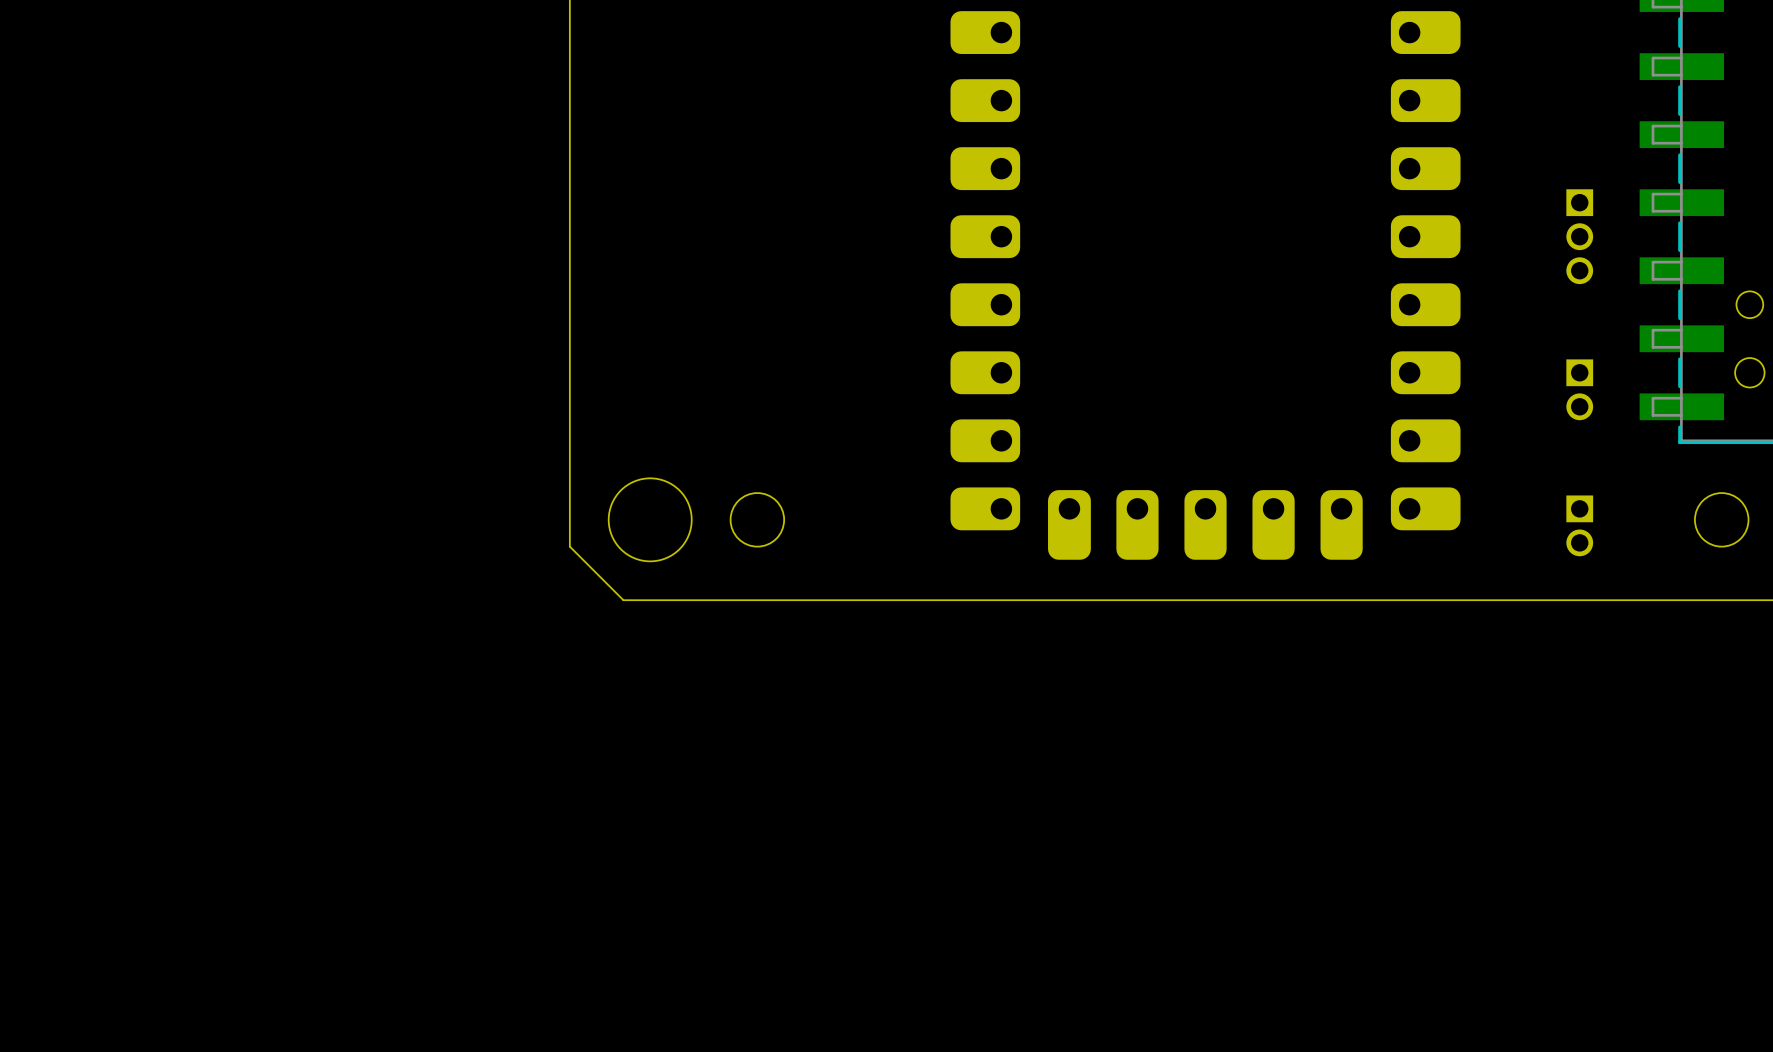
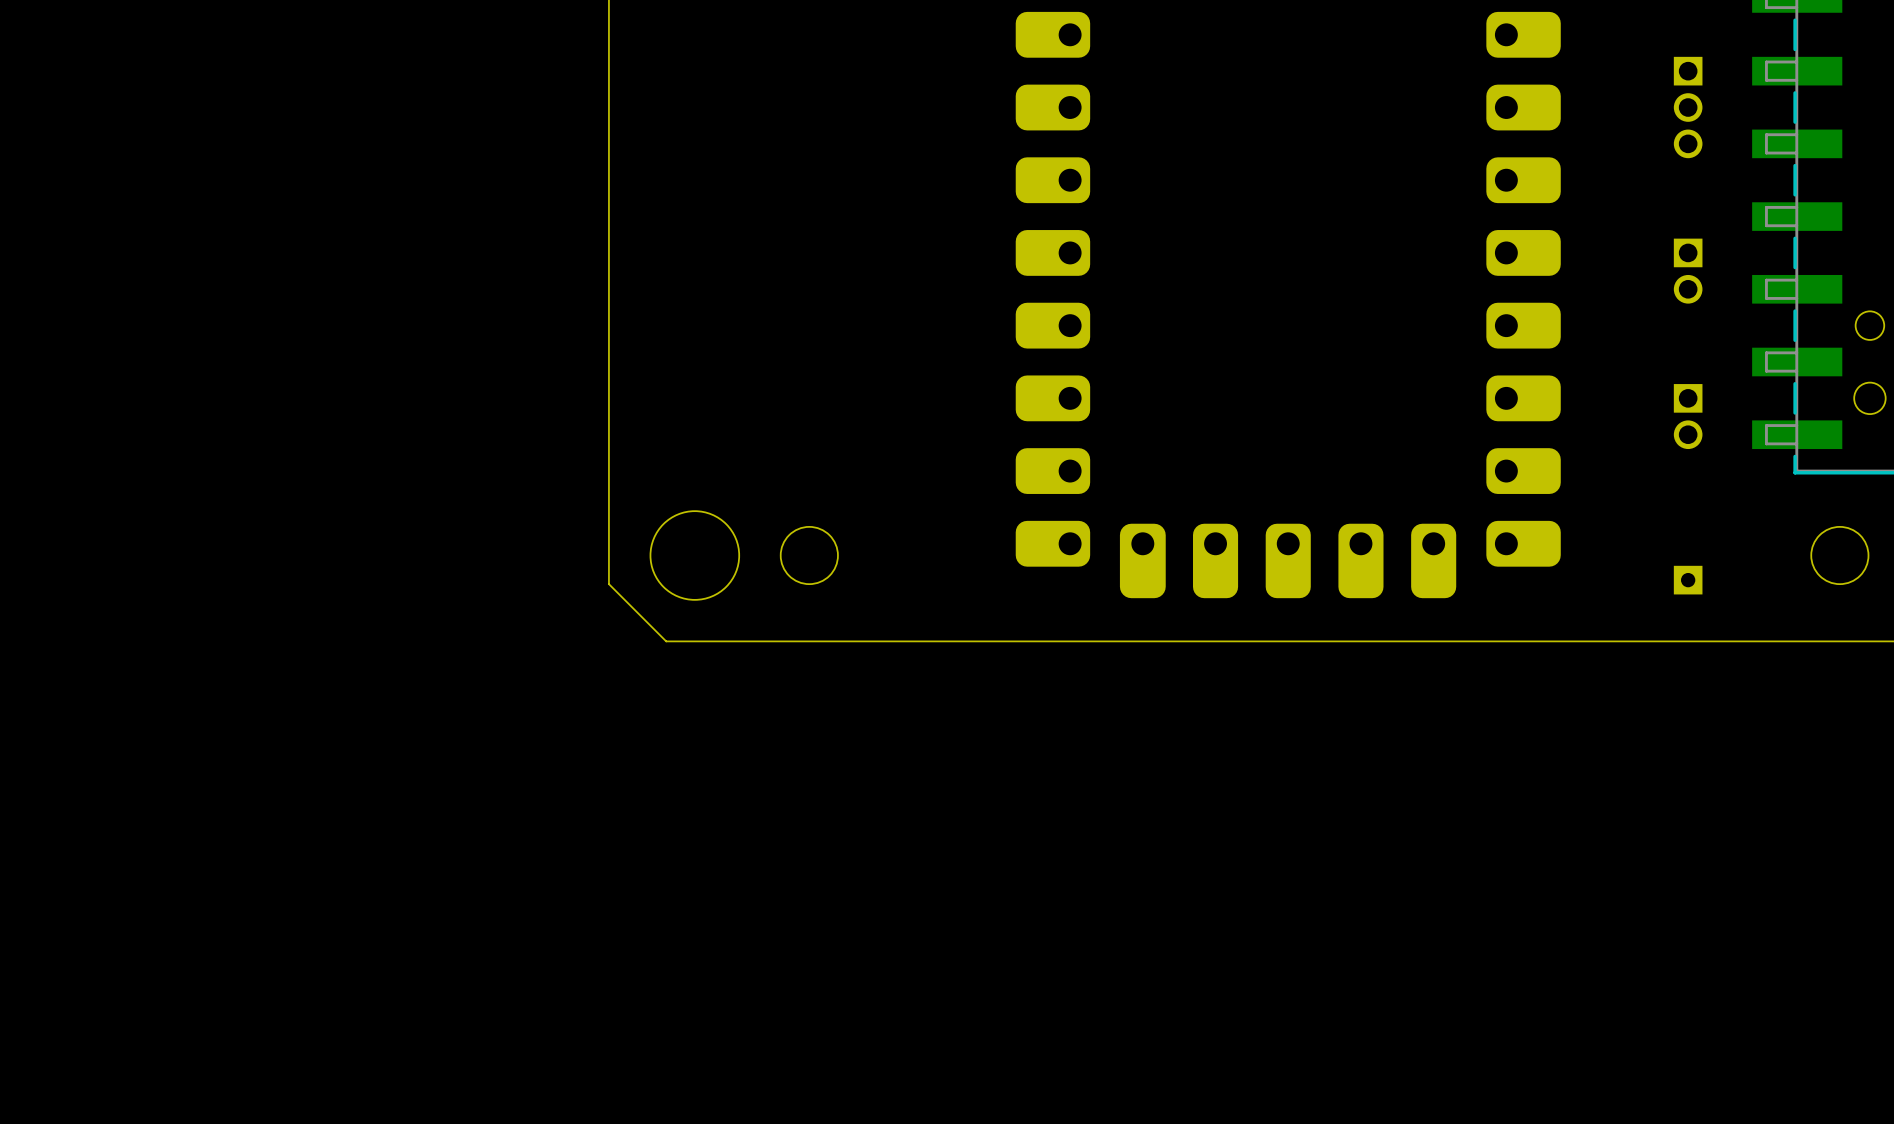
part: none -> (1688, 107)
part footprint: [1566, 189, 1594, 285] -> [1673, 238, 1703, 304]
part footprint: [1566, 495, 1594, 557] -> [1673, 565, 1703, 595]

